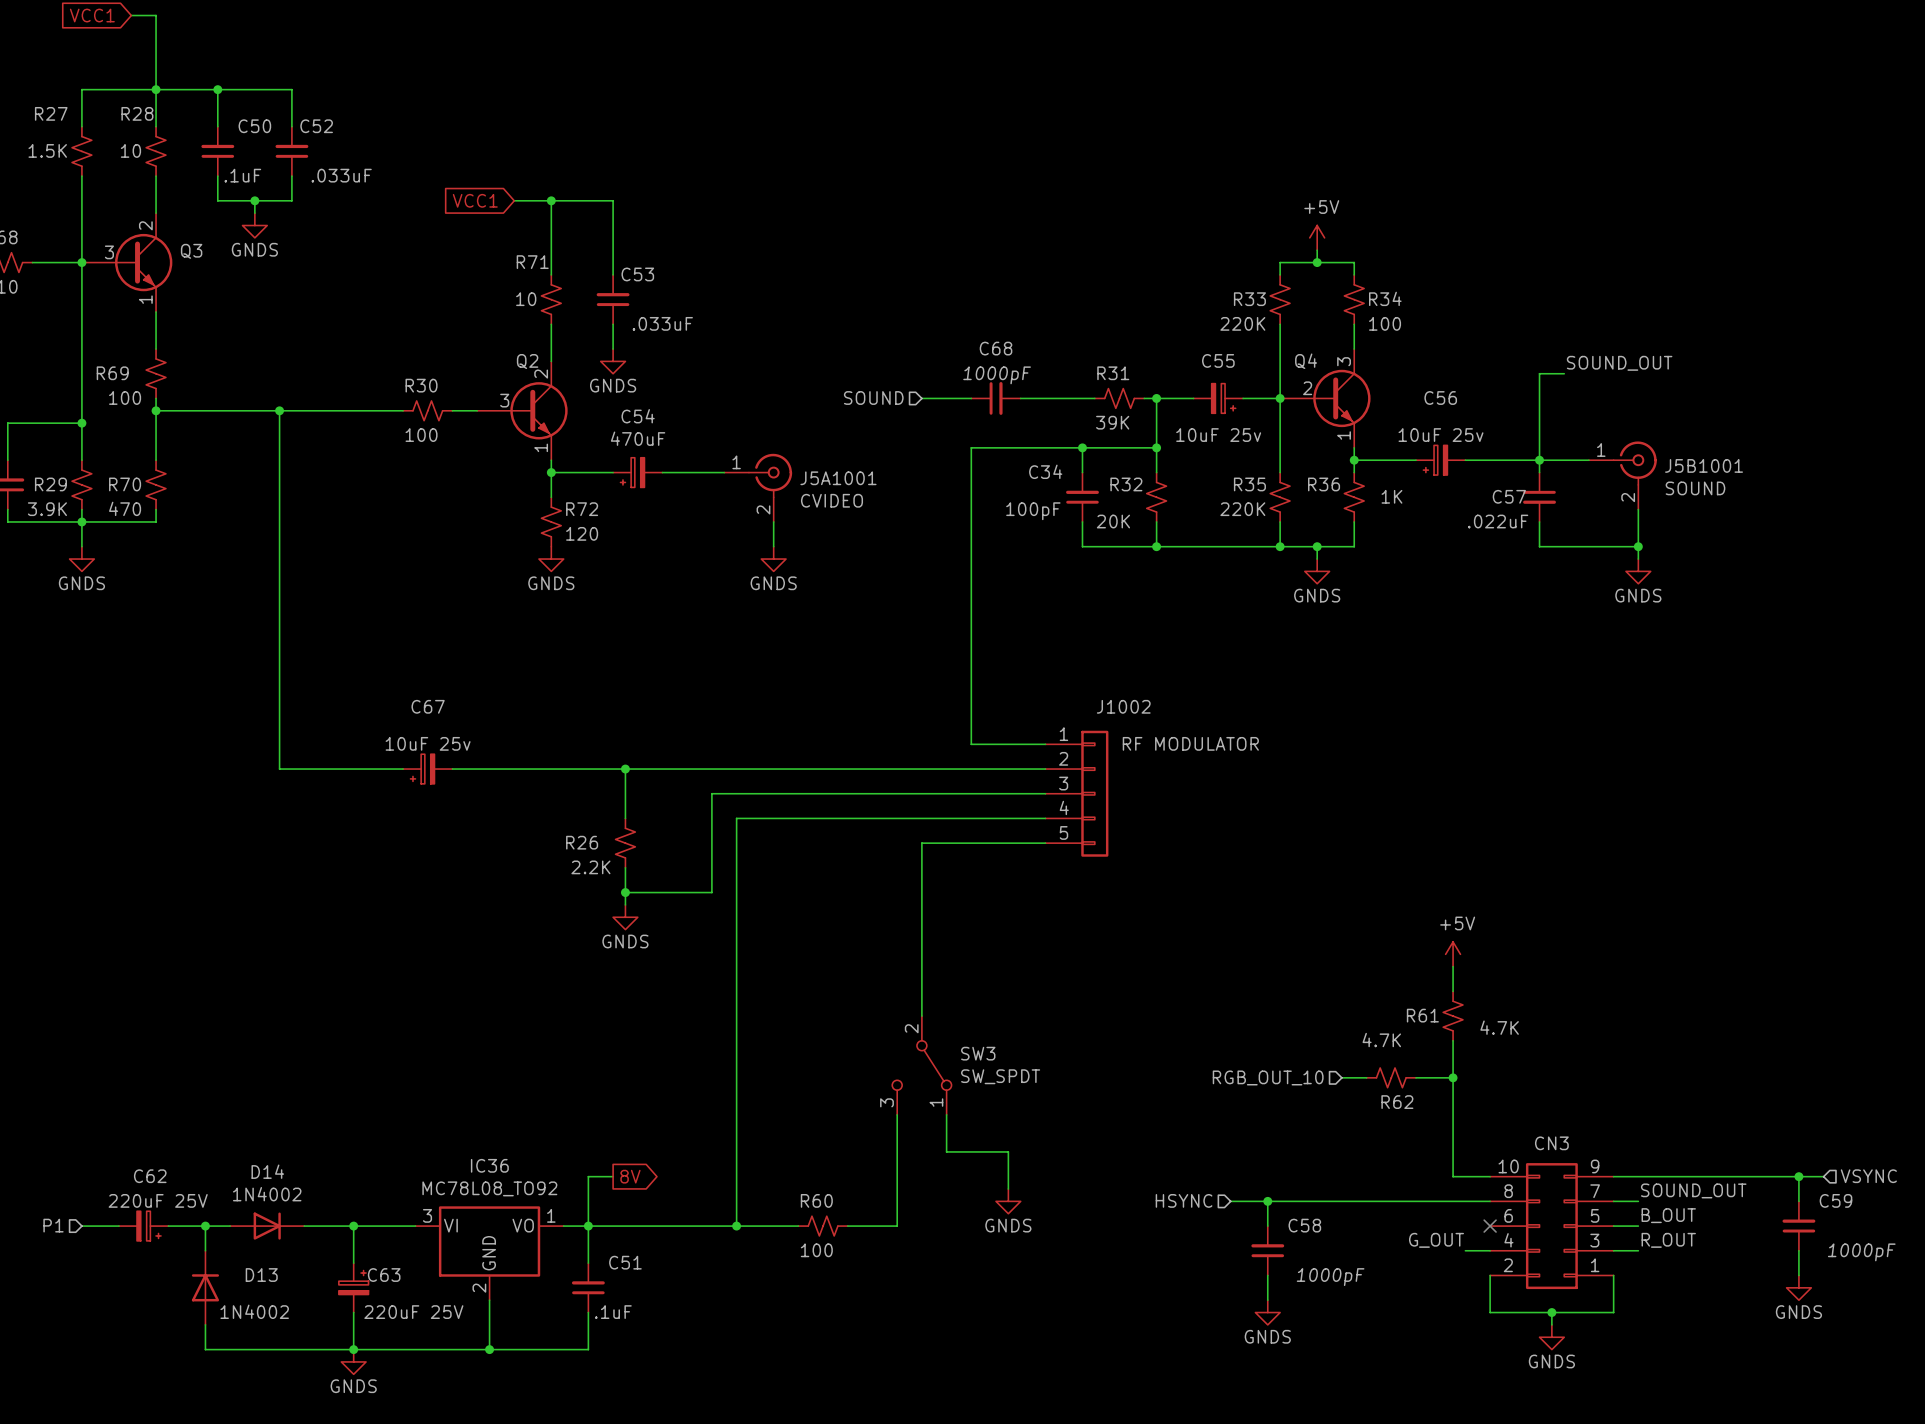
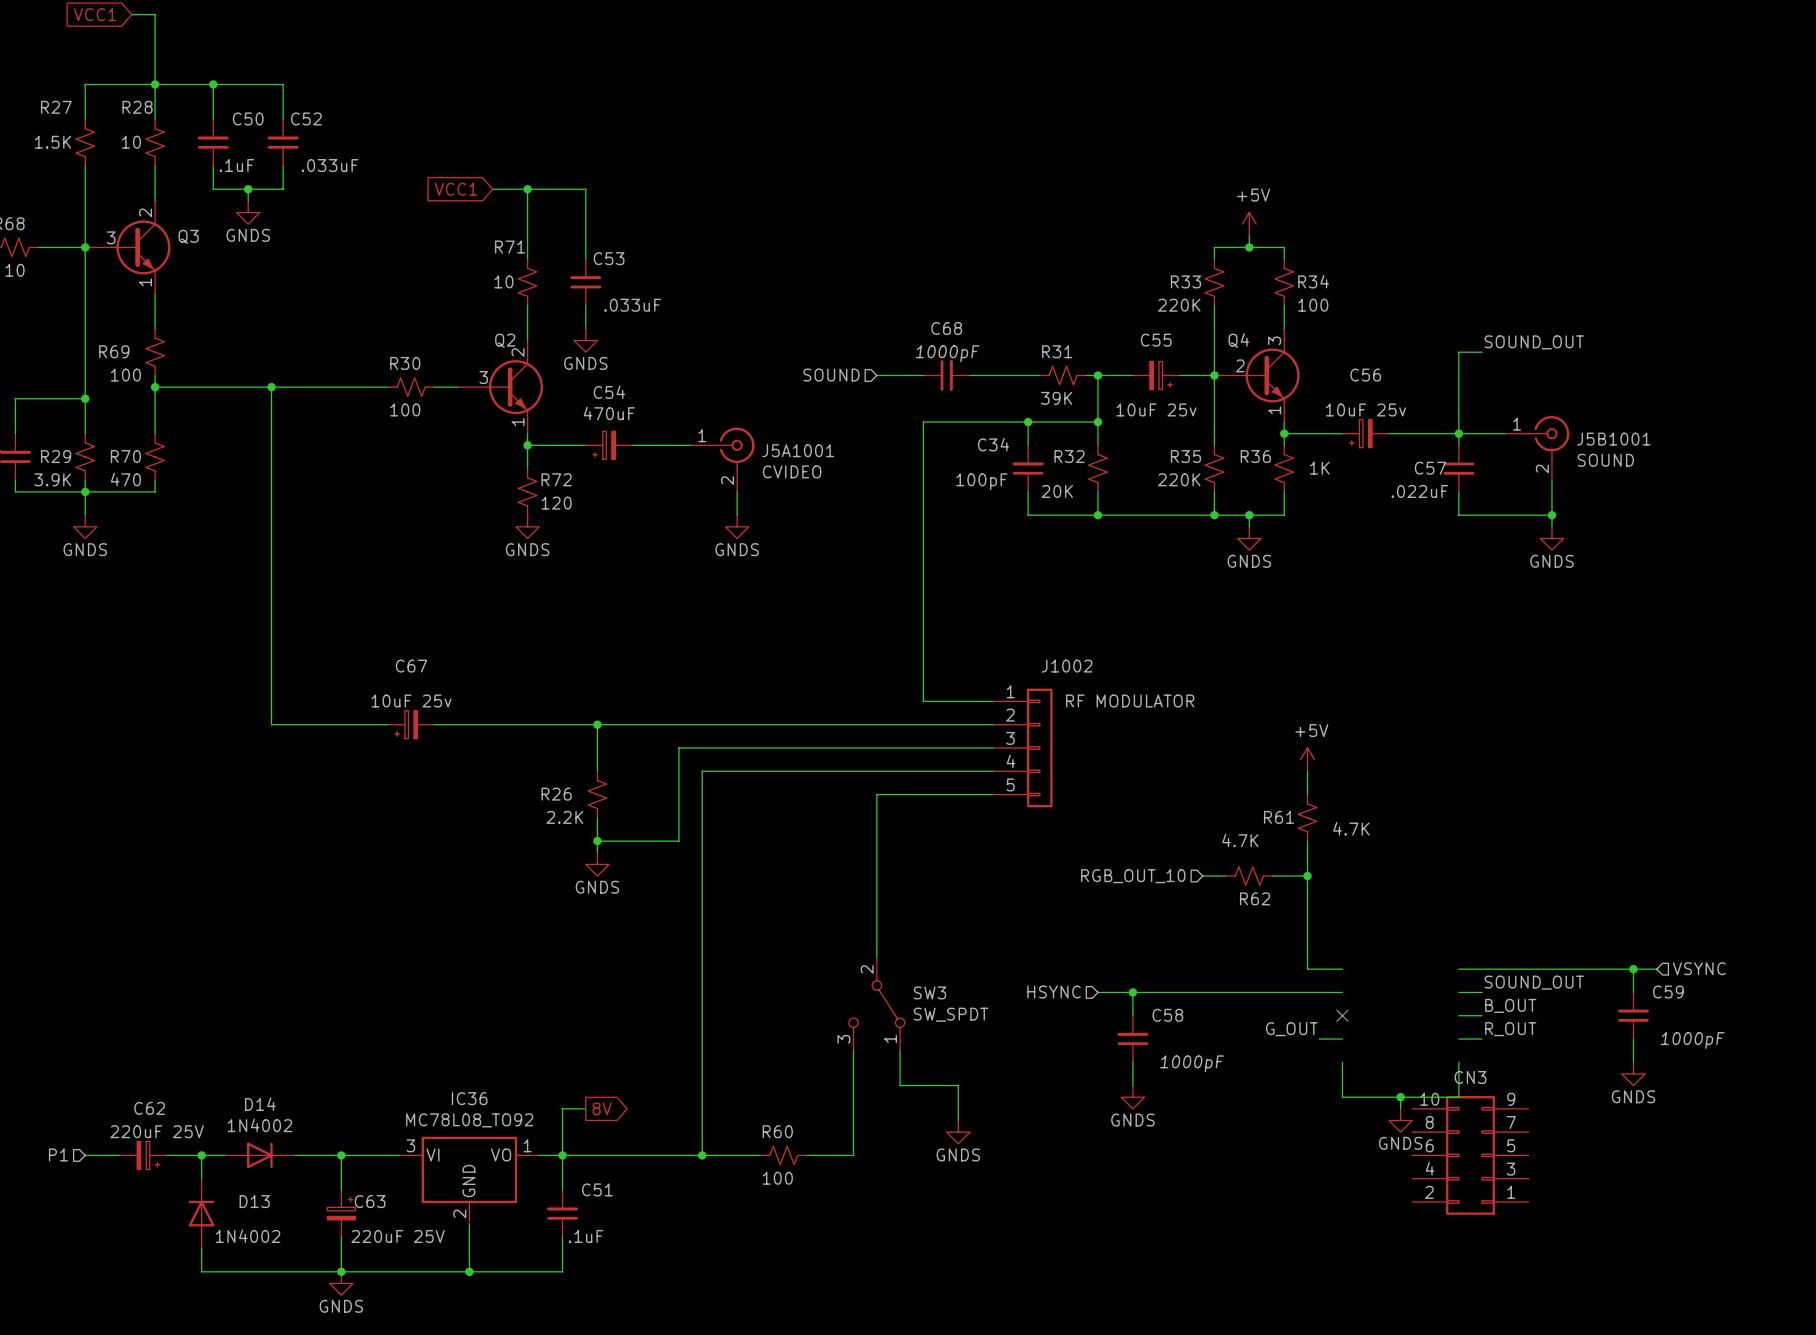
junction: none -> (1307, 876)
power symbol position: +5V (1453, 954) -> +5V (1307, 759)
wire: (1453, 966) (1453, 991) -> (1307, 771) (1307, 794)
R61 position: (1453, 1016) -> (1307, 817)
junction: none -> (1633, 969)
wire: (1453, 1040) (1453, 1176) (1490, 1176) -> (1307, 841) (1307, 969) (1342, 969)
junction: none -> (1132, 992)
hierarchical label position: RGB_OUT_10 (1268, 1077) -> RGB_OUT_10 (1133, 876)
wire: (1341, 1077) (1366, 1077) -> (1202, 876) (1226, 876)
R62 position: (1391, 1077) -> (1249, 876)
wire: (1416, 1077) (1453, 1077) -> (1272, 876) (1307, 876)
no-connect mark: none -> (1342, 1015)
junction: (1453, 1077) -> none
power symbol: none -> GNDS (1633, 1073)
power symbol: none -> GNDS (1132, 1097)
junction: none -> (1400, 1097)
wire: (1613, 1176) (1823, 1176) -> (1458, 969) (1656, 969)
wire: (1798, 1176) (1798, 1201) -> (1633, 969) (1633, 992)
junction: (1798, 1176) -> none
hierarchical label position: VSYNC (1868, 1176) -> VSYNC (1699, 968)
power symbol: none -> GNDS (1400, 1120)
label position: SOUND_OUT (1693, 1190) -> SOUND_OUT (1534, 982)
hierarchical label position: HSYNC (1184, 1200) -> HSYNC (1054, 992)
wire: (1230, 1201) (1490, 1201) -> (1097, 992) (1342, 992)
wire: (1267, 1201) (1267, 1226) -> (1132, 992) (1132, 1015)
junction: (1267, 1201) -> none
wire: (1613, 1201) (1638, 1201) -> (1458, 992) (1482, 992)
label position: B_OUT (1668, 1215) -> B_OUT (1510, 1005)
no-connect mark: (1490, 1226) -> none
wire: (1613, 1226) (1638, 1226) -> (1458, 1015) (1482, 1015)
C59 position: (1798, 1226) -> (1633, 1015)
label position: G_OUT (1436, 1240) -> G_OUT (1291, 1029)
label position: R_OUT (1668, 1240) -> R_OUT (1510, 1029)
C58 position: (1267, 1250) -> (1132, 1039)
wire: (1465, 1250) (1490, 1250) -> (1319, 1039) (1342, 1039)
wire: (1613, 1250) (1638, 1250) -> (1458, 1039) (1482, 1039)
wire: (1798, 1250) (1798, 1275) -> (1633, 1039) (1633, 1062)
wire: (1267, 1275) (1267, 1300) -> (1132, 1062) (1132, 1085)
wire: (1490, 1275) (1490, 1312) (1613, 1312) (1613, 1275) -> (1342, 1062) (1342, 1097) (1458, 1097) (1458, 1062)
power symbol: GNDS (1798, 1287) -> none
power symbol: GNDS (1267, 1312) -> none
wire: (1551, 1312) (1551, 1324) -> (1400, 1097) (1400, 1108)
junction: (1551, 1312) -> none
power symbol: GNDS (1551, 1337) -> none

